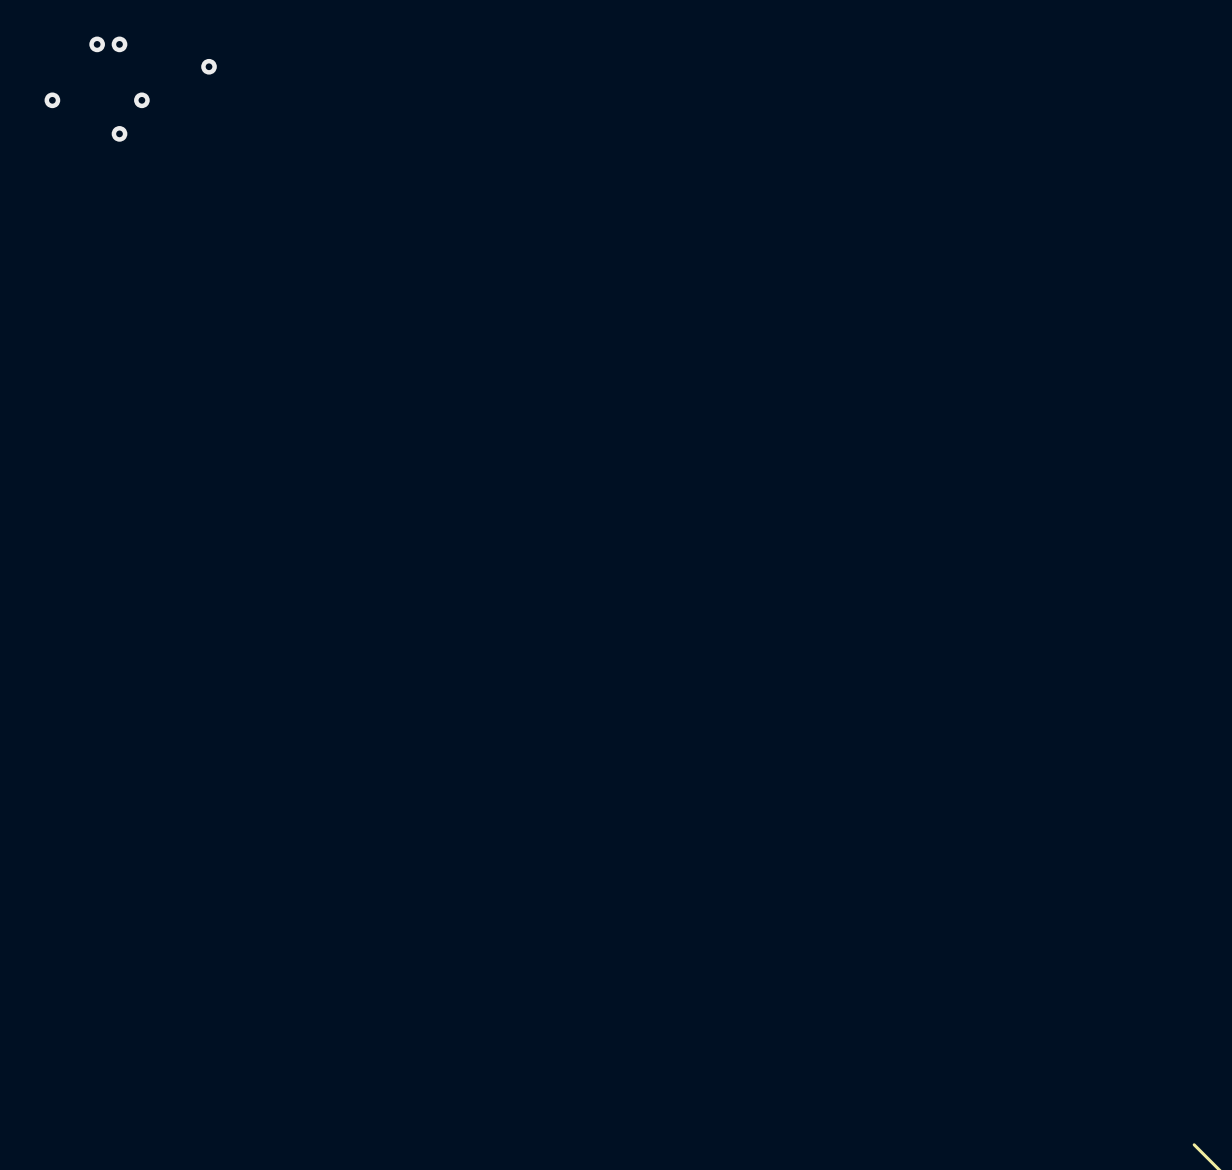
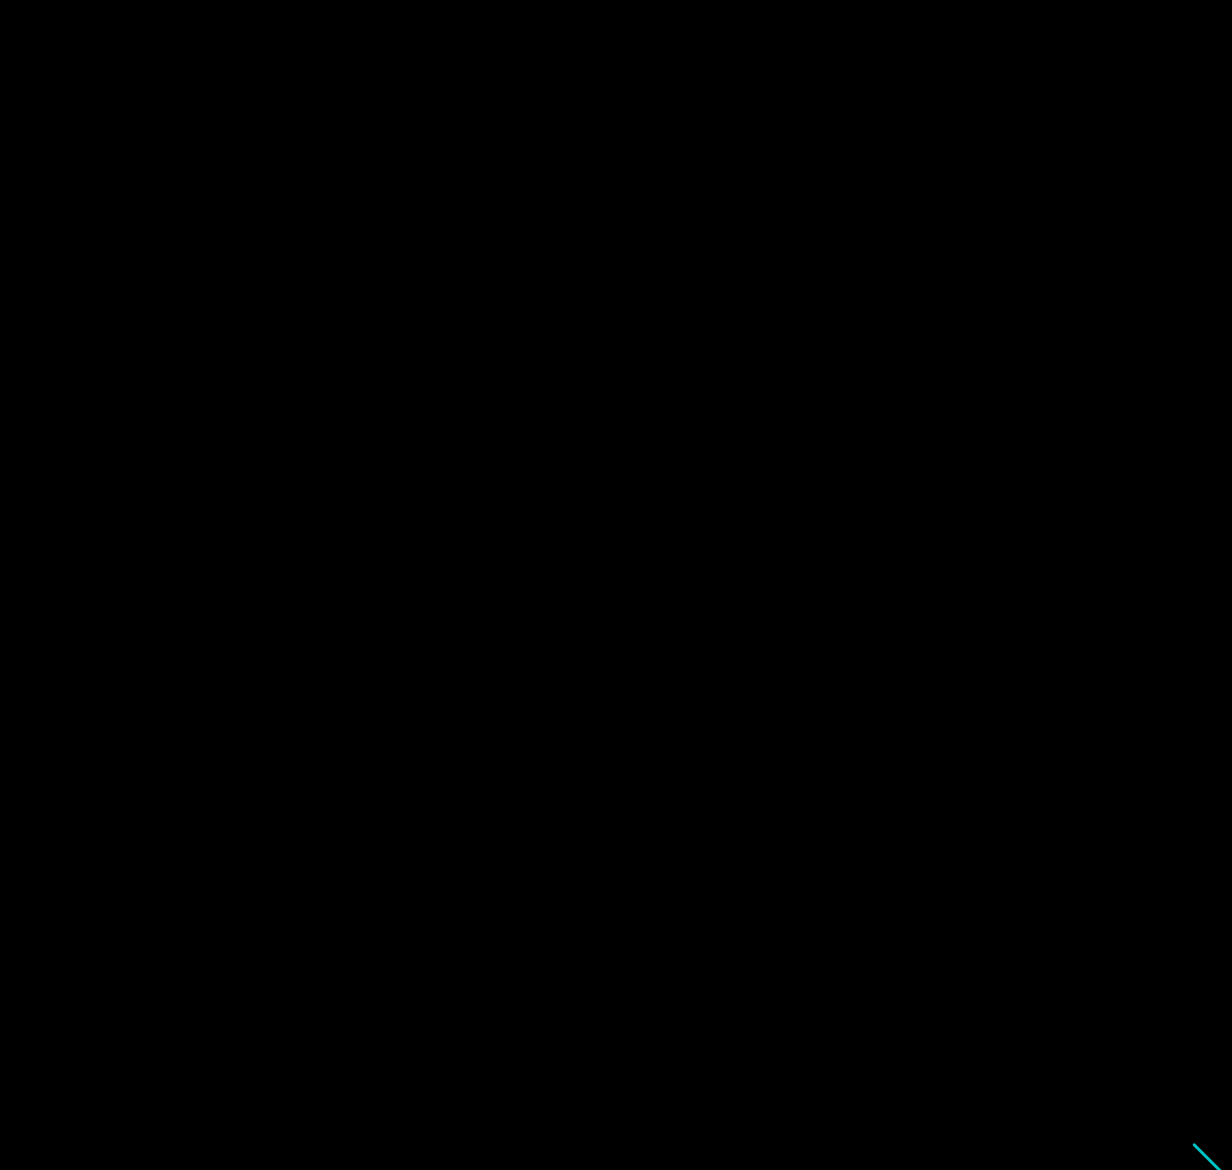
via: (97, 44) -> none
via: (119, 44) -> none
via: (209, 66) -> none
via: (52, 100) -> none
via: (141, 100) -> none
via: (119, 133) -> none

